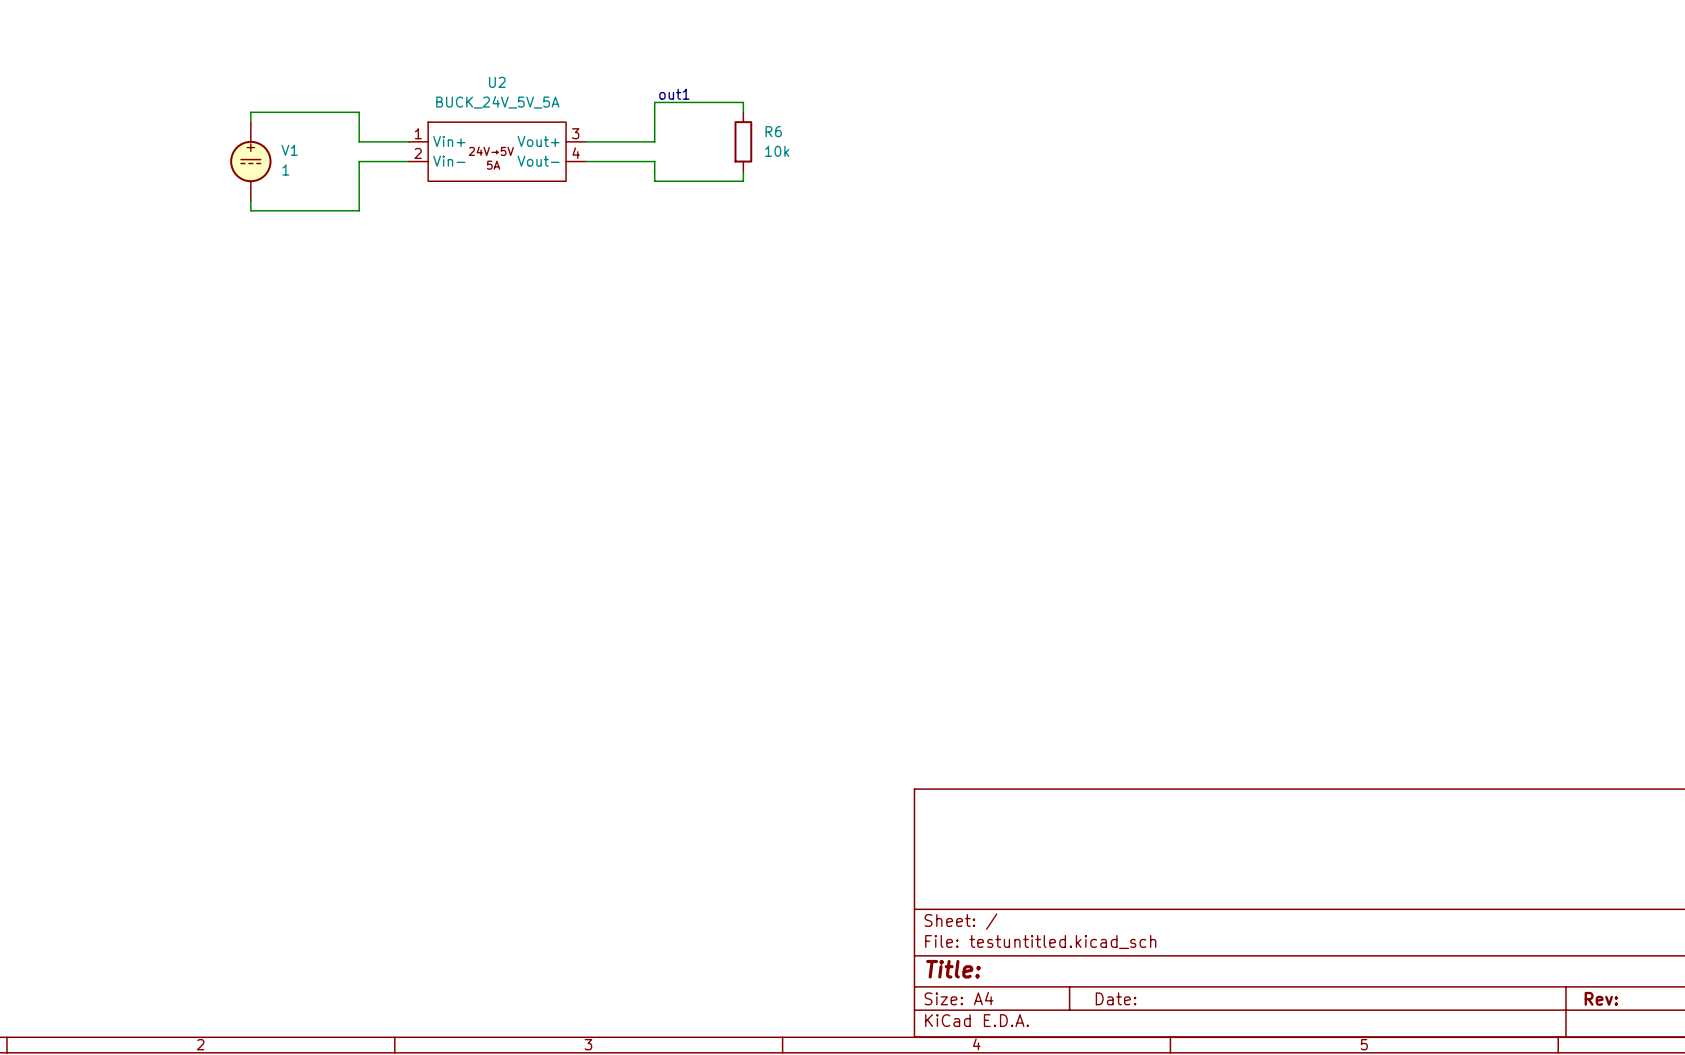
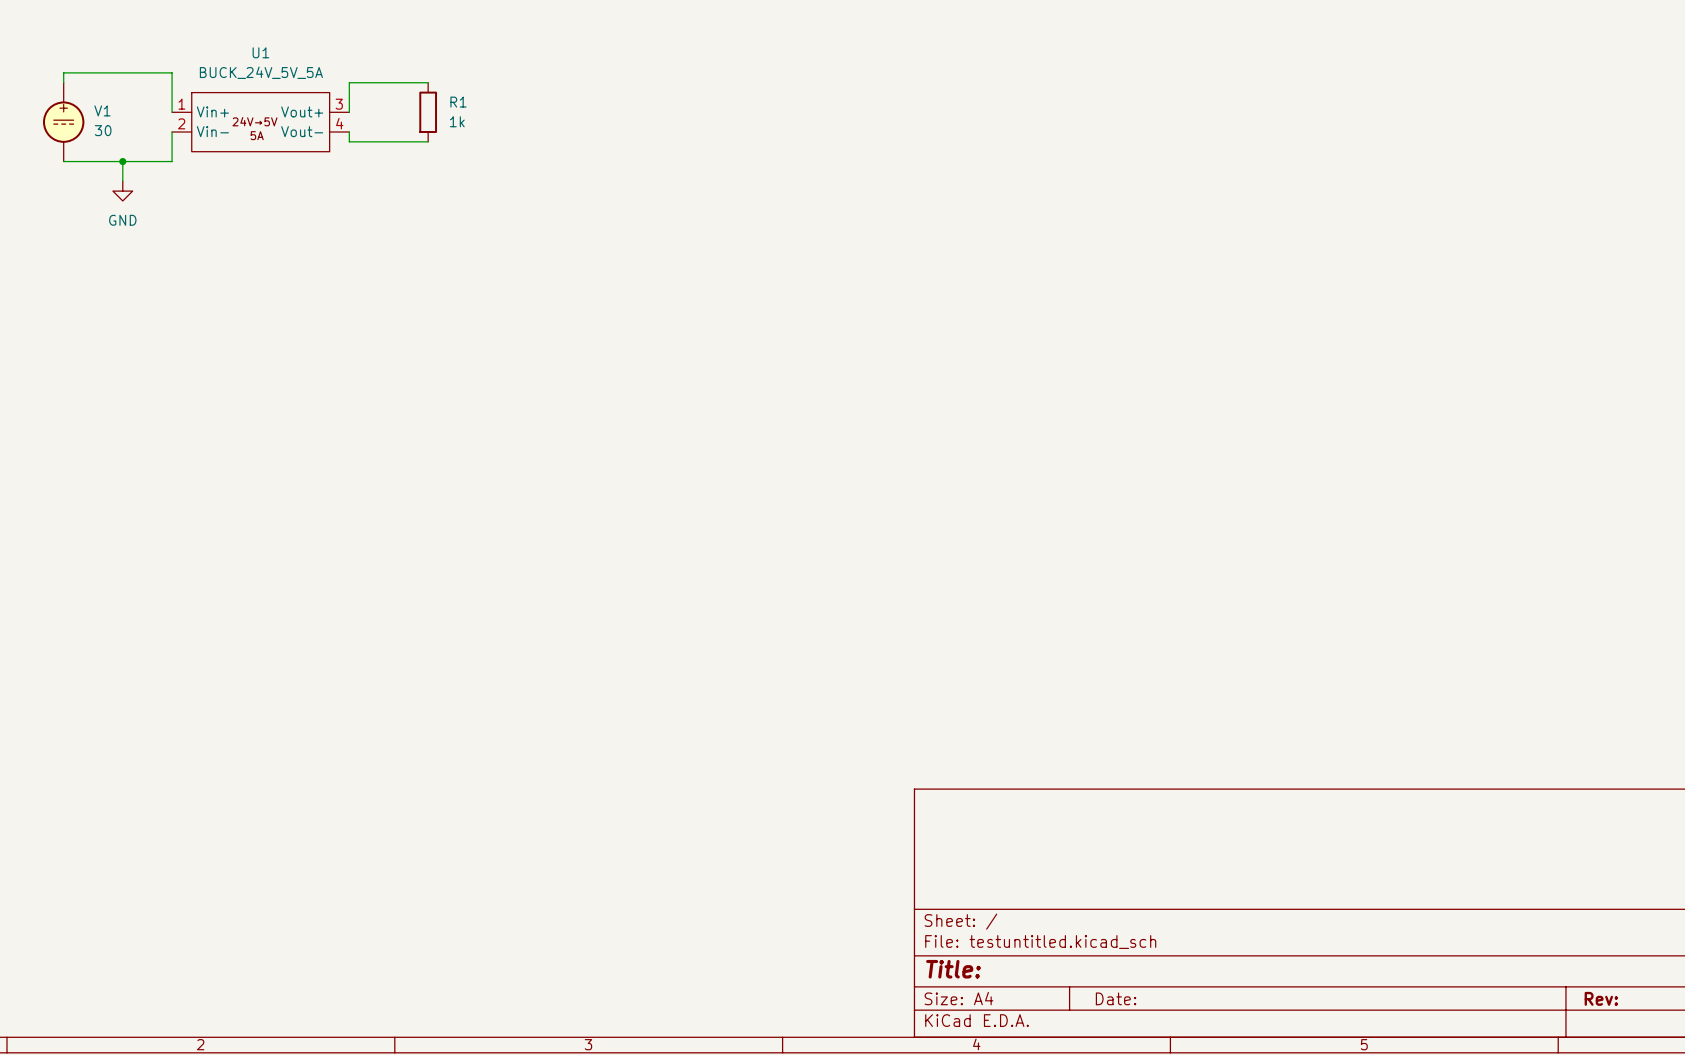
wire: none -> (63, 82) (63, 72) (172, 72) (172, 112)
wire: none -> (428, 82) (349, 82) (349, 112)
text: out1 (674, 94) -> none
R1: none -> 1k (428, 112)
wire: (743, 112) (743, 102) (654, 102) (654, 141) (585, 141) -> none
wire: (250, 122) (250, 112) (359, 112) (359, 141) -> (349, 132) (349, 141) (359, 141)
U1: none -> BUCK_24V_5V_5A (260, 122)
wire: none -> (172, 132) (172, 161) (63, 161)
R6: 10k (743, 141) -> none
U2: BUCK_24V_5V_5A (497, 151) -> none
wire: none -> (122, 161) (122, 181)
junction: none -> (122, 161)
V1 position: (250, 161) -> (63, 122)
wire: (408, 161) (359, 161) (359, 210) (250, 210) (250, 200) -> none
wire: (585, 161) (654, 161) (654, 181) (743, 181) (743, 171) -> none
V1 value: 1 (285, 170) -> 30 (103, 130)
power symbol: none -> GND (122, 191)

